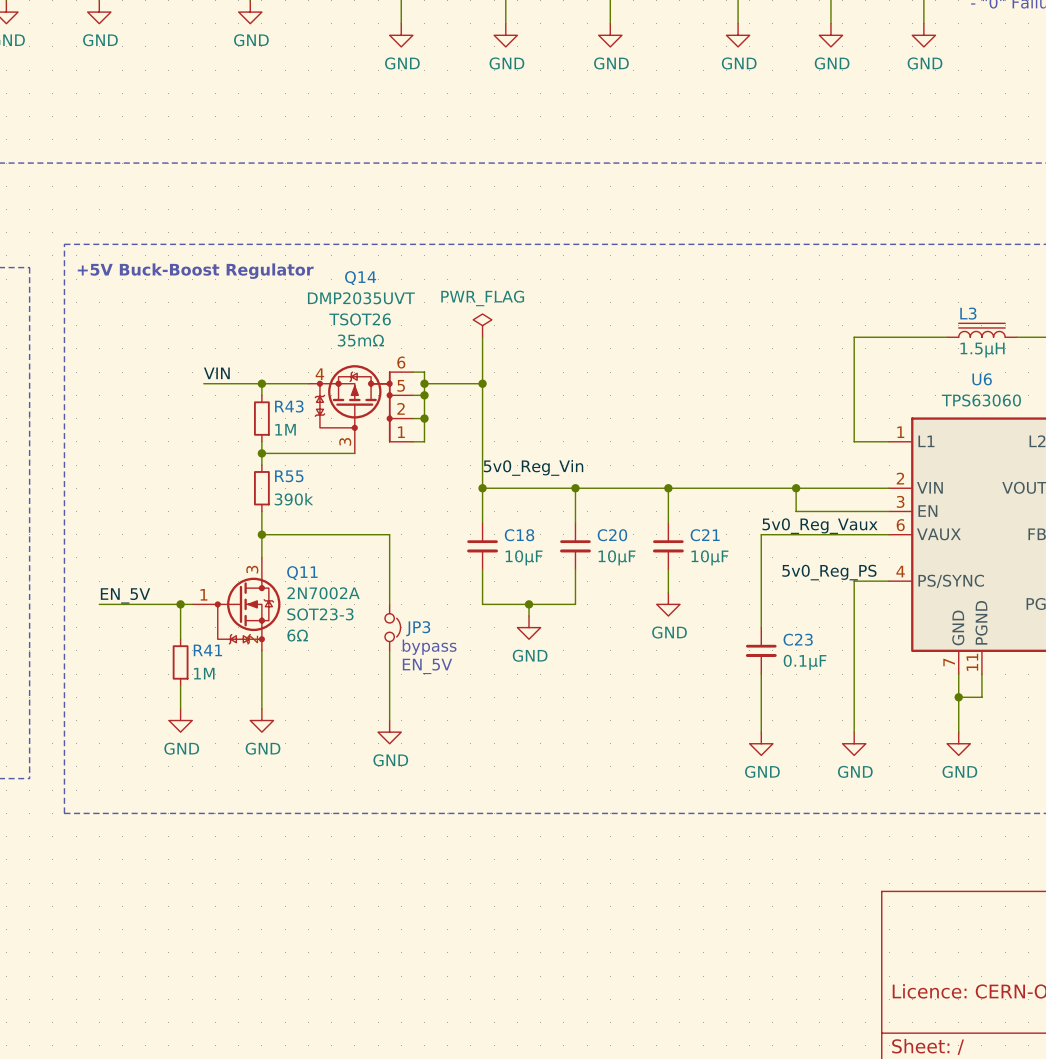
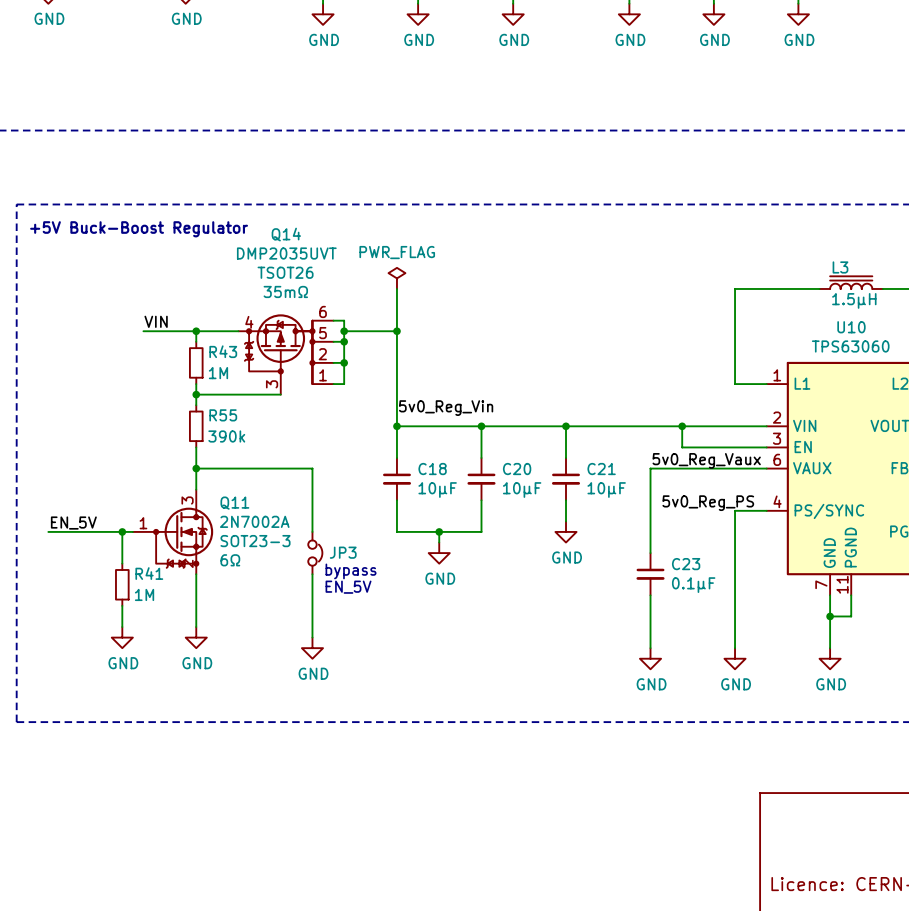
U6 name: U6 (982, 379) -> U10 (851, 327)

